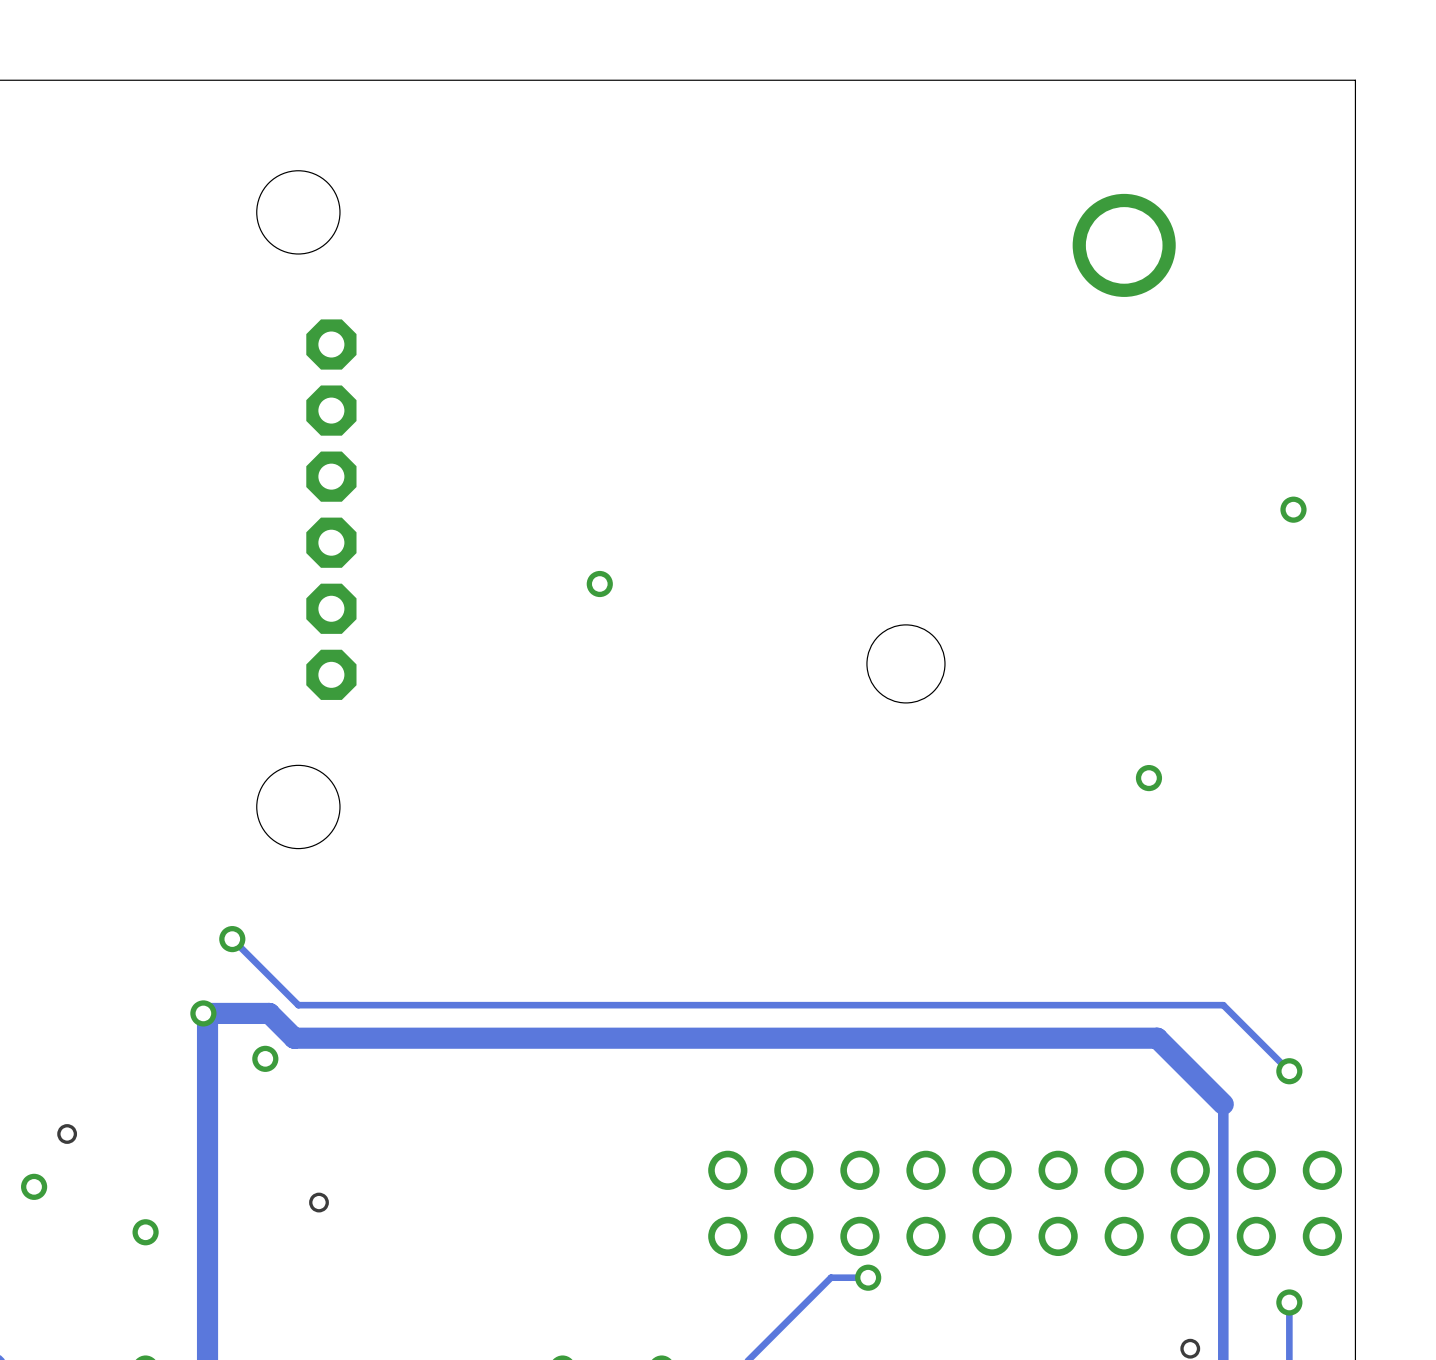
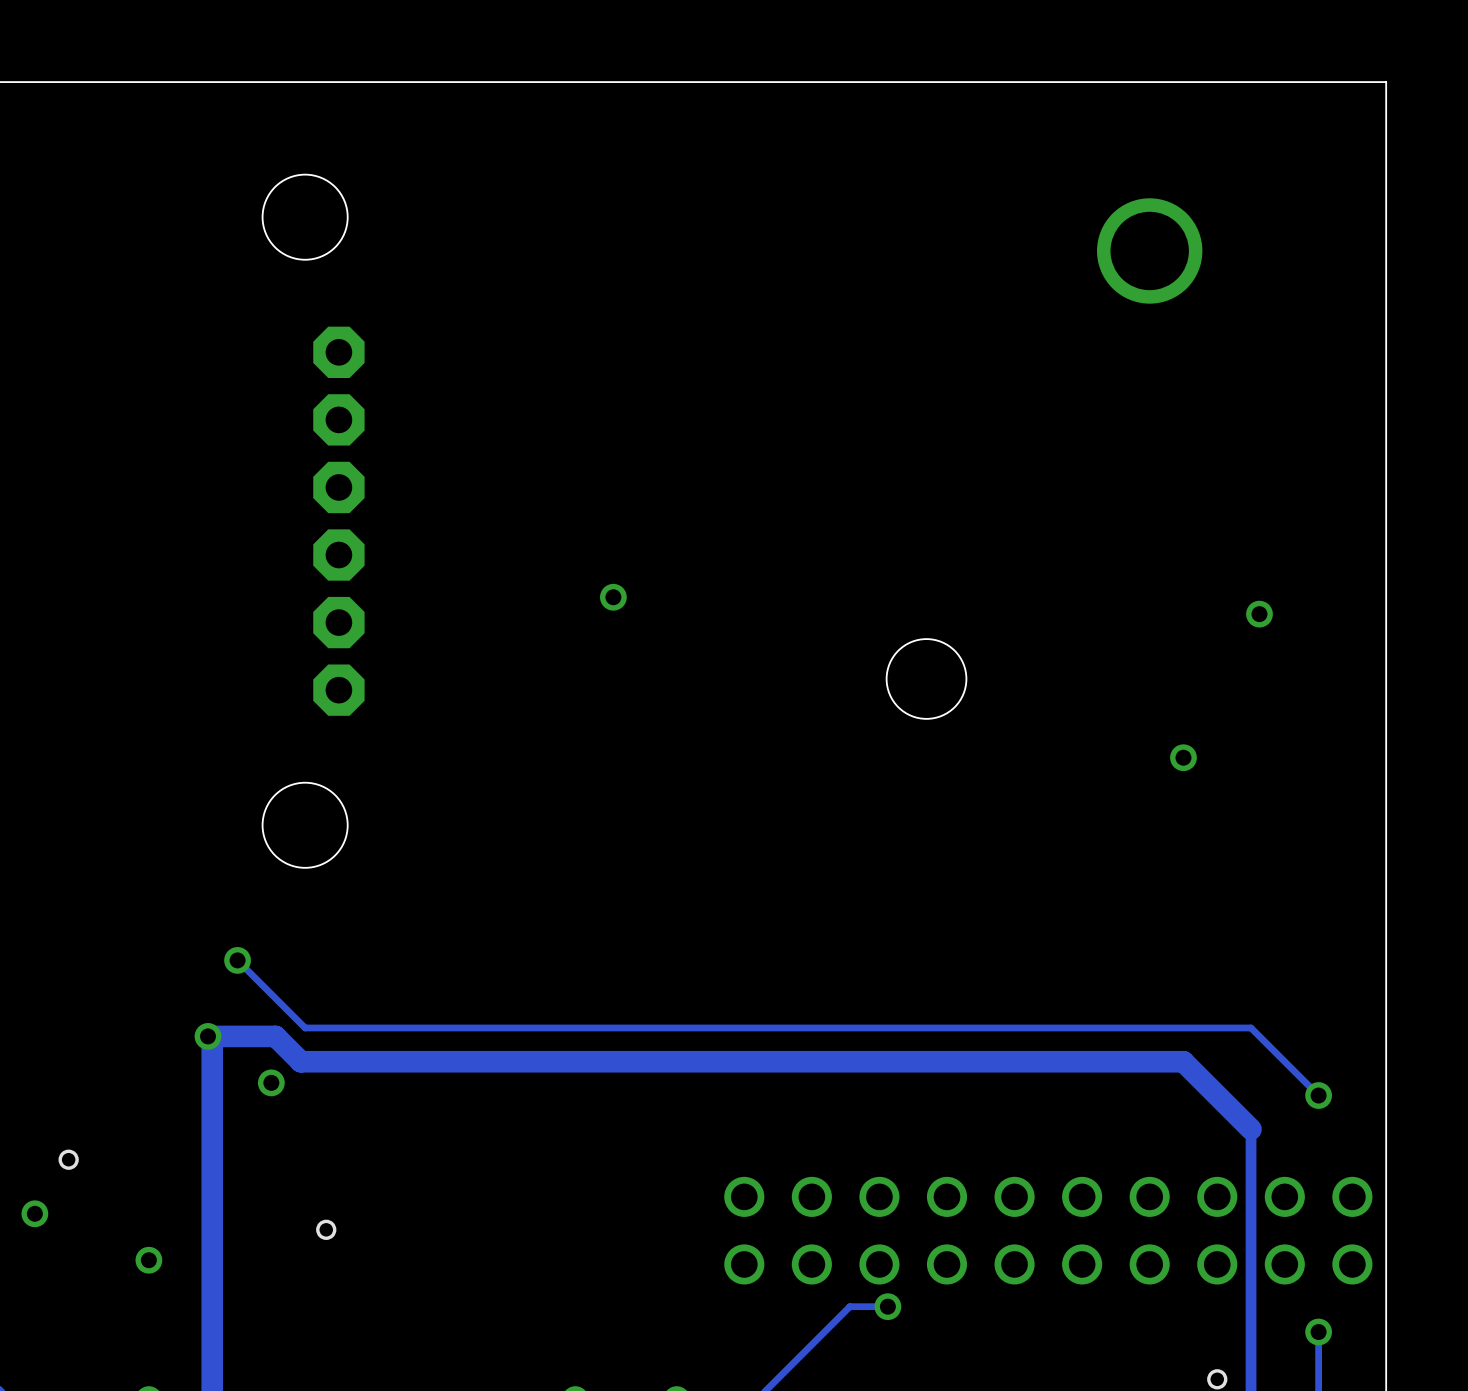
via: (1293, 509) -> none
via: none -> (1259, 614)
via position: (1148, 778) -> (1183, 757)

